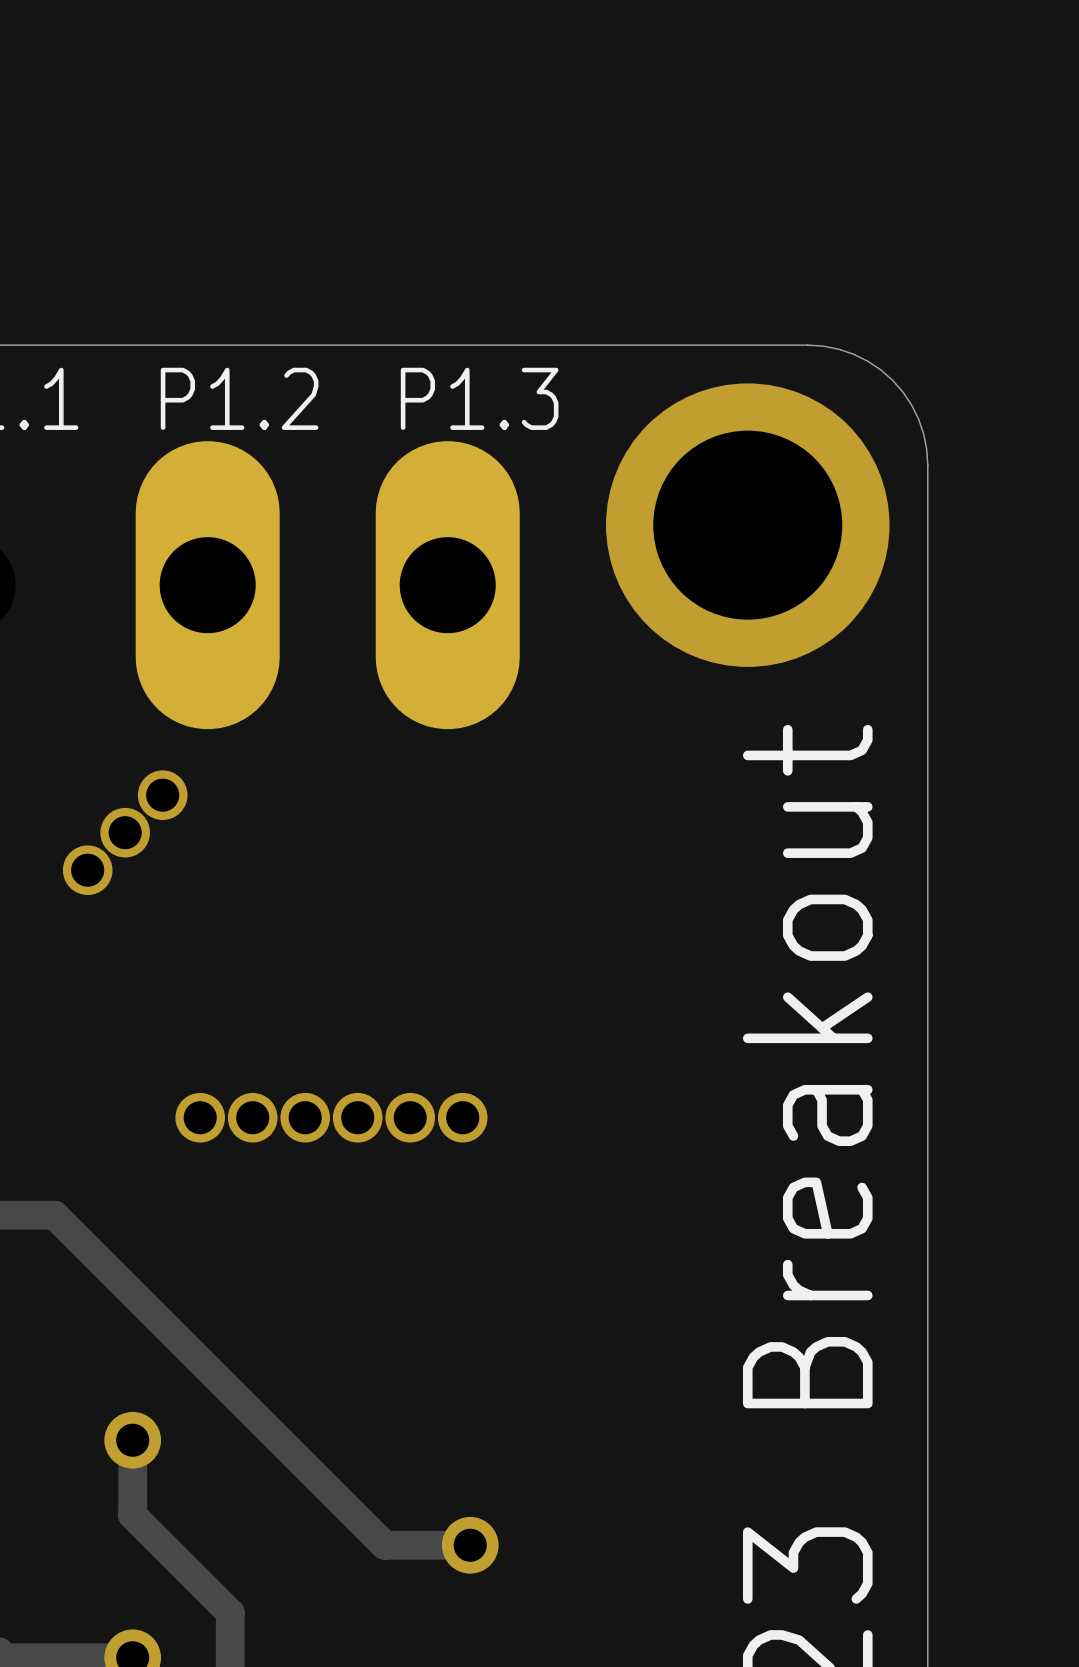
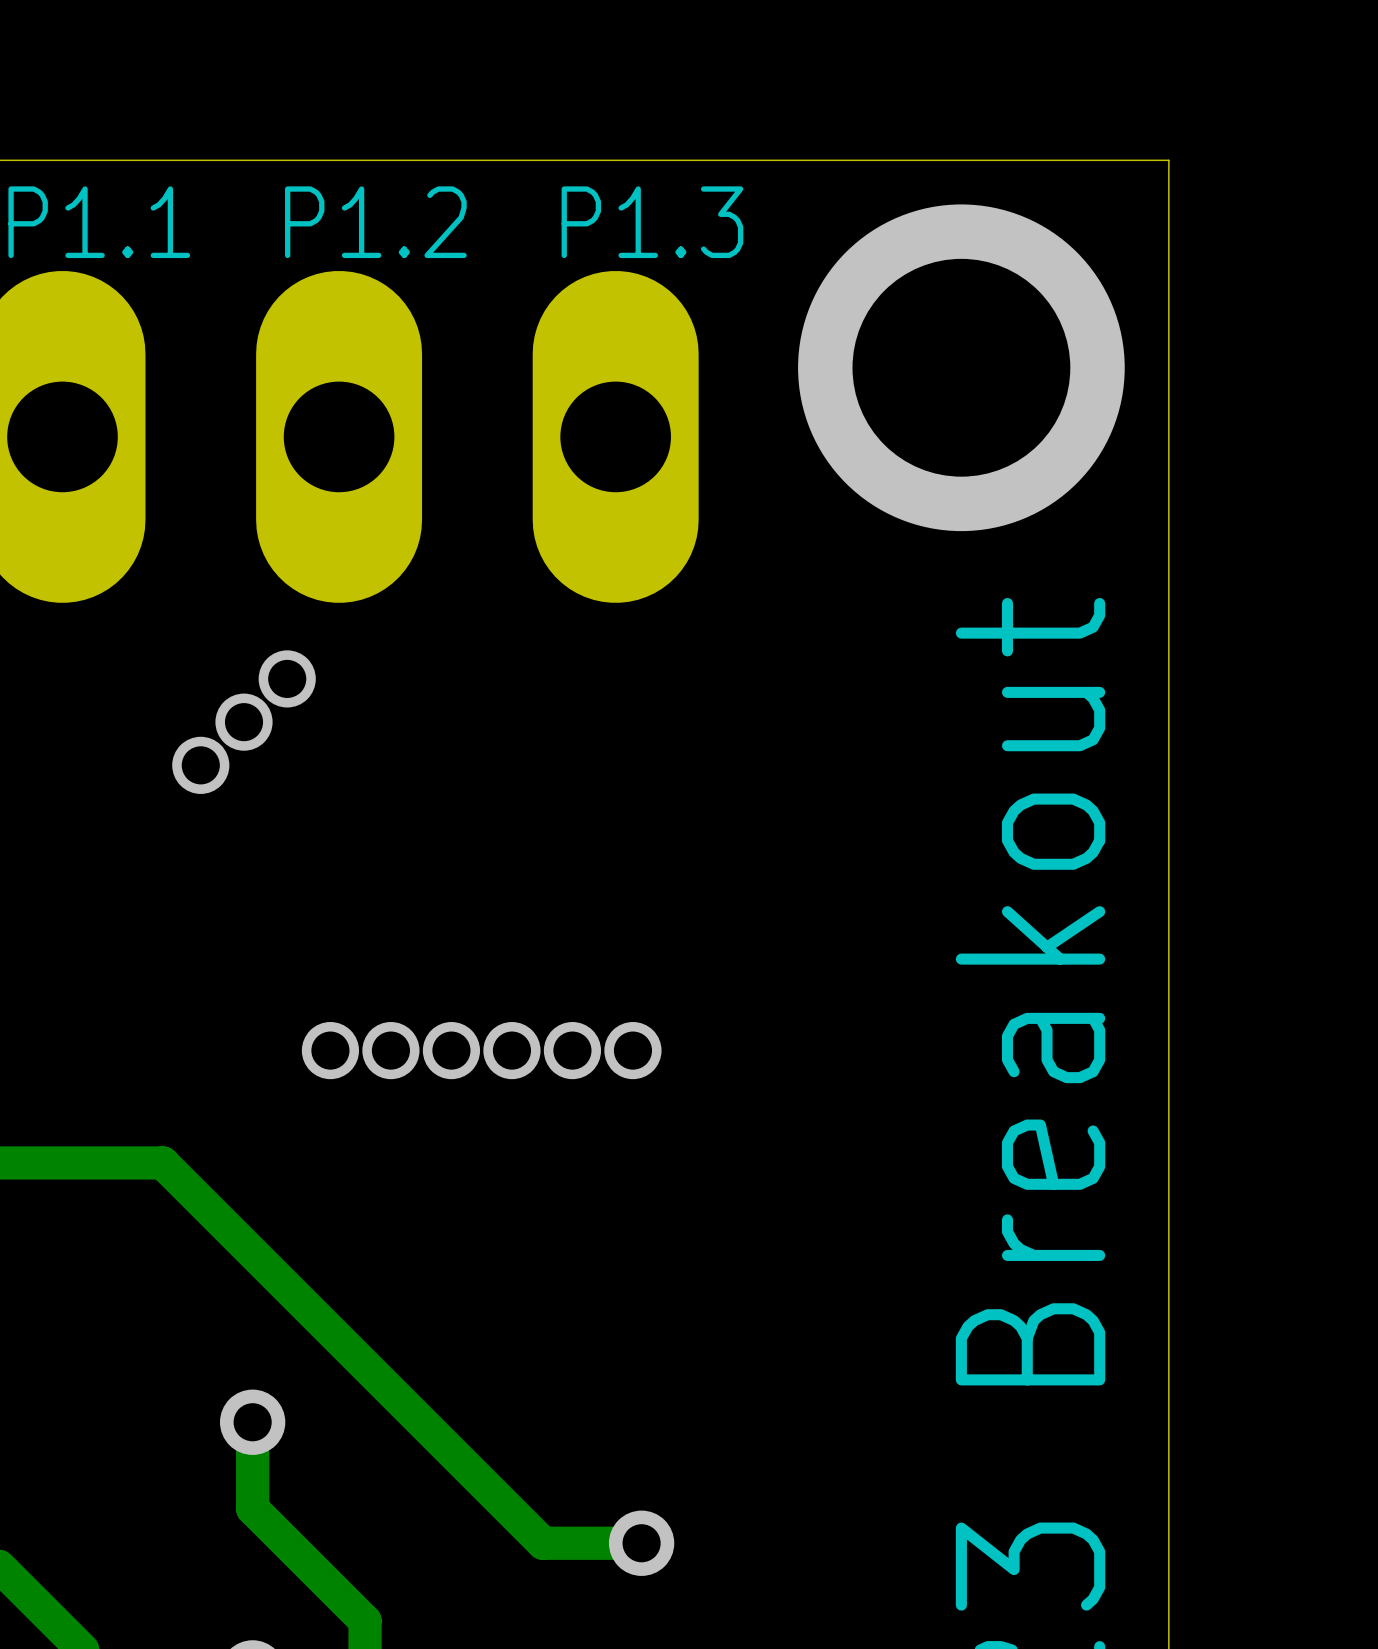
board edge: (807, 345) (838, 349) (853, 354) (867, 361) (892, 380) (911, 405) (918, 419) (923, 434) (927, 465) -> (1030, 160) (1168, 160) (1168, 298)

